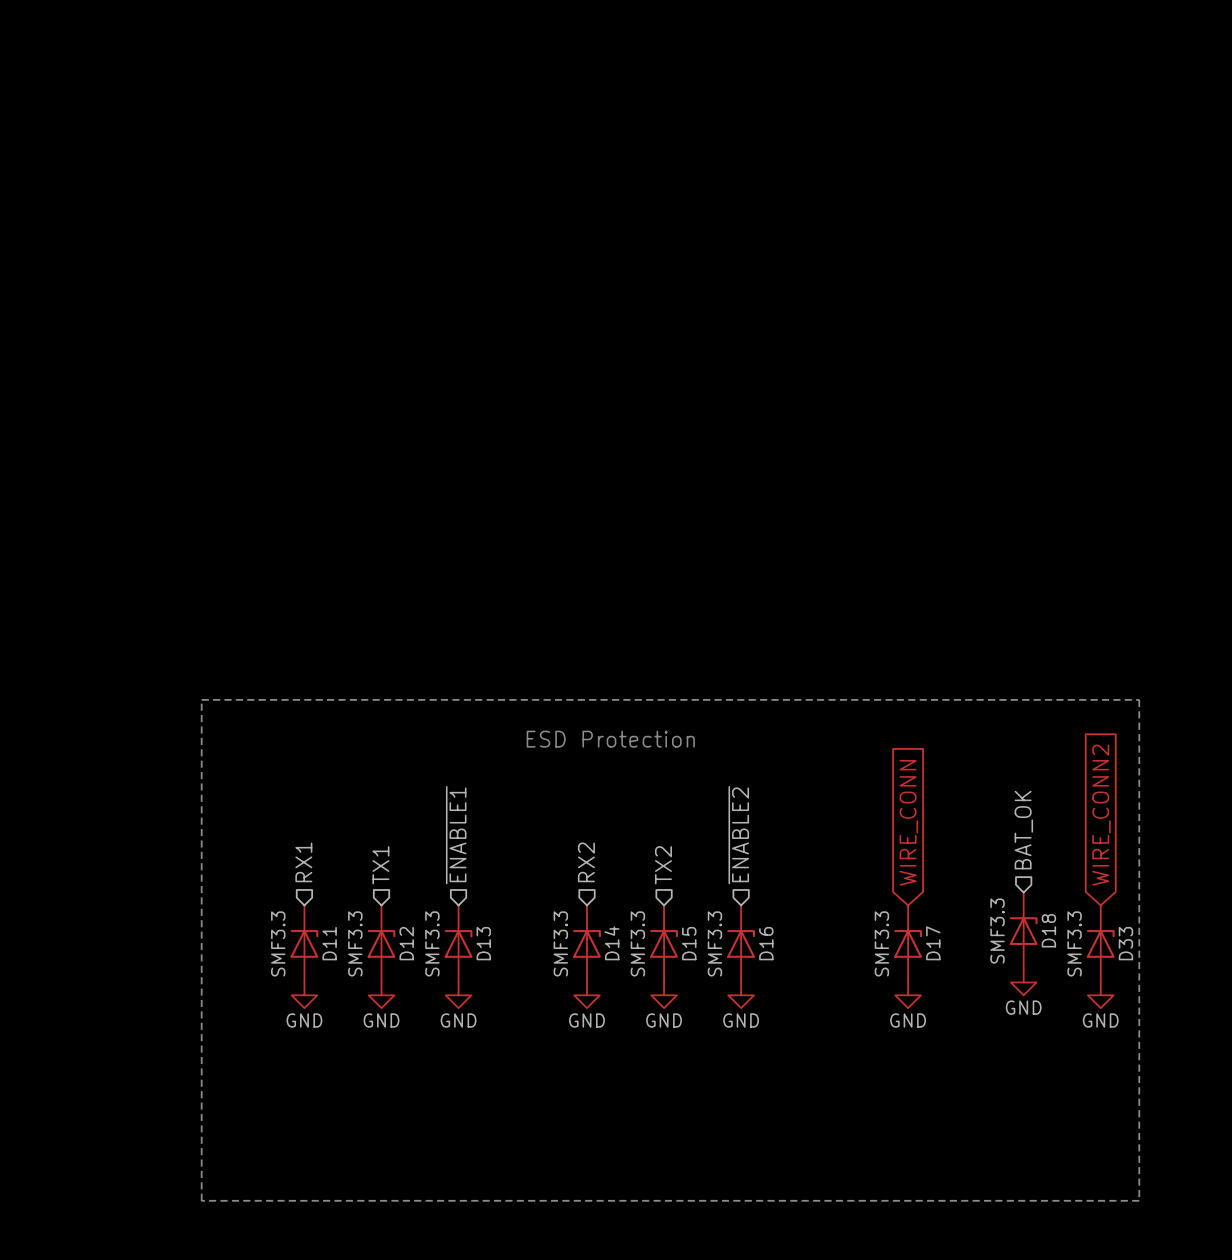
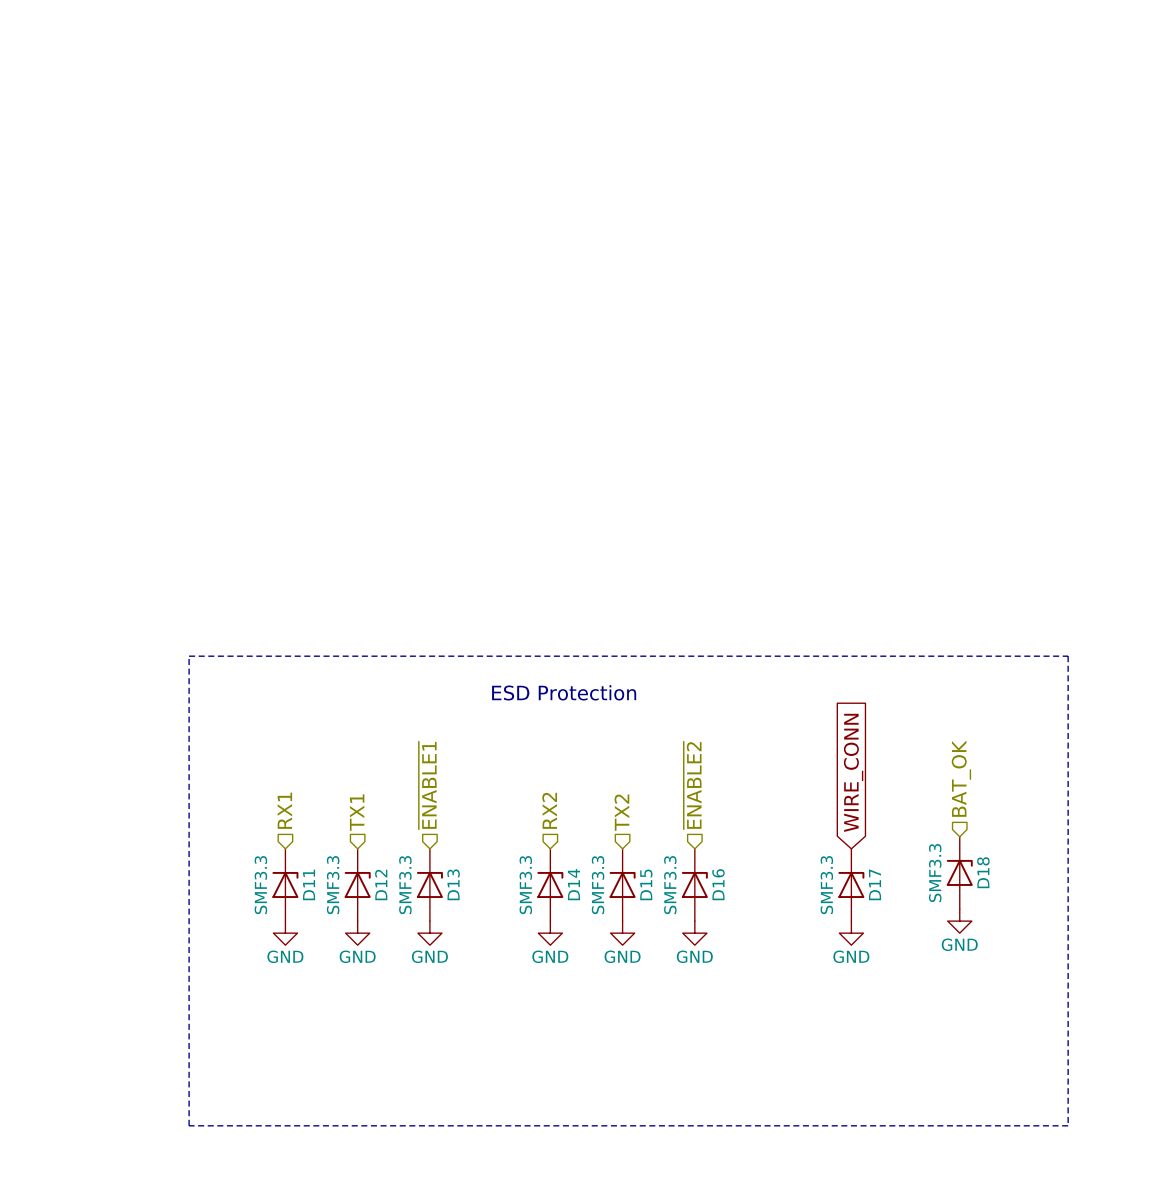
global label: WIRE_CONN2 (1101, 815) -> none
D33: SMF3.3 (1100, 943) -> none
power symbol: GND (1100, 995) -> none

